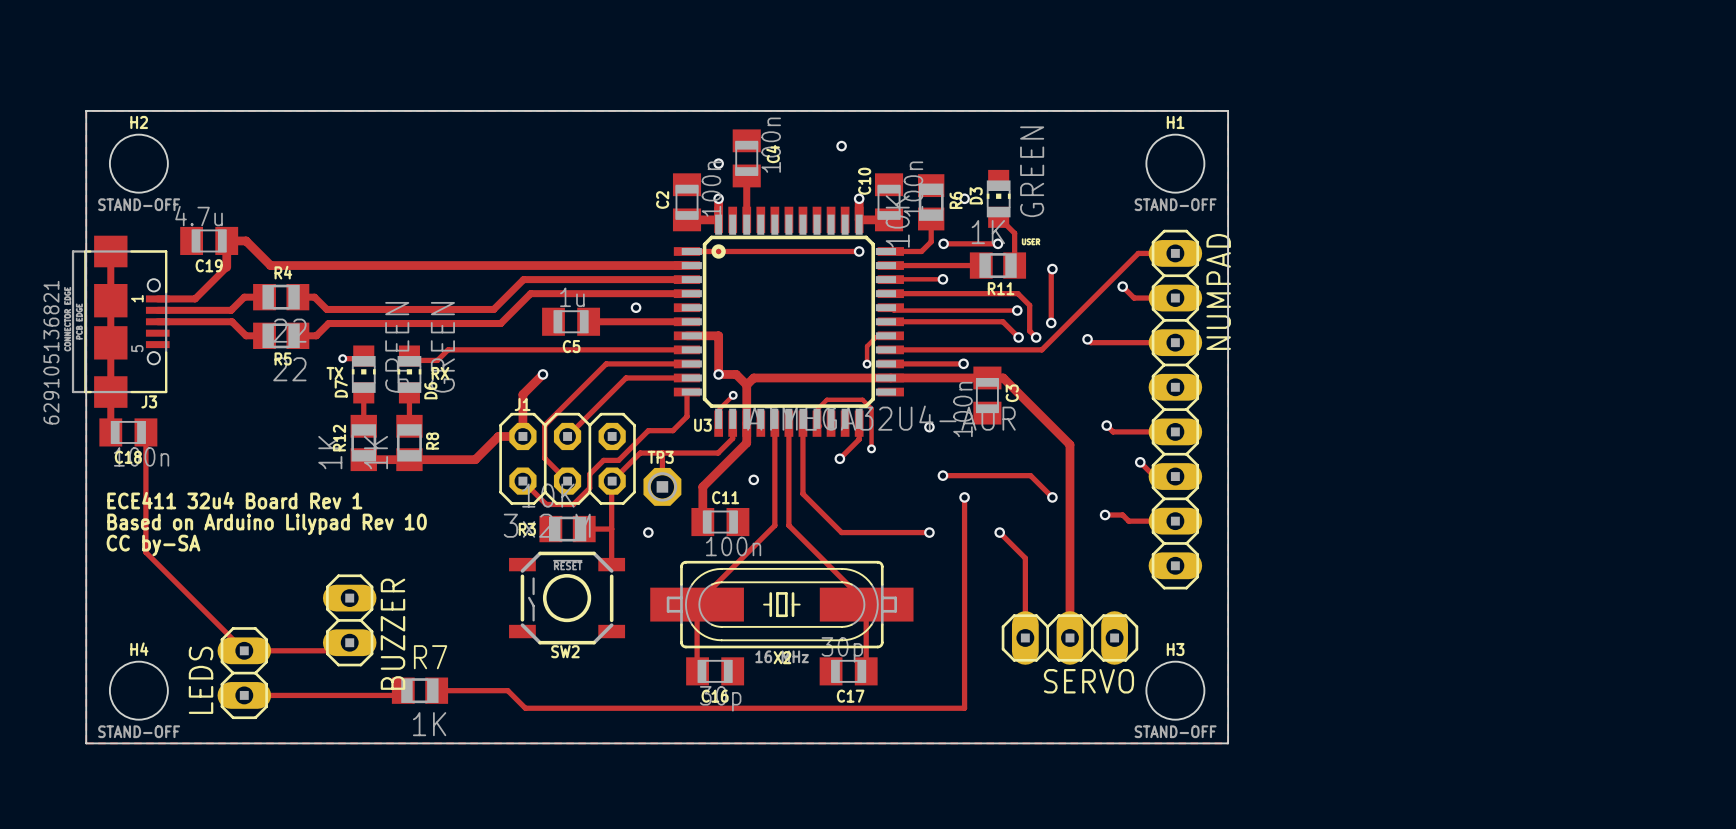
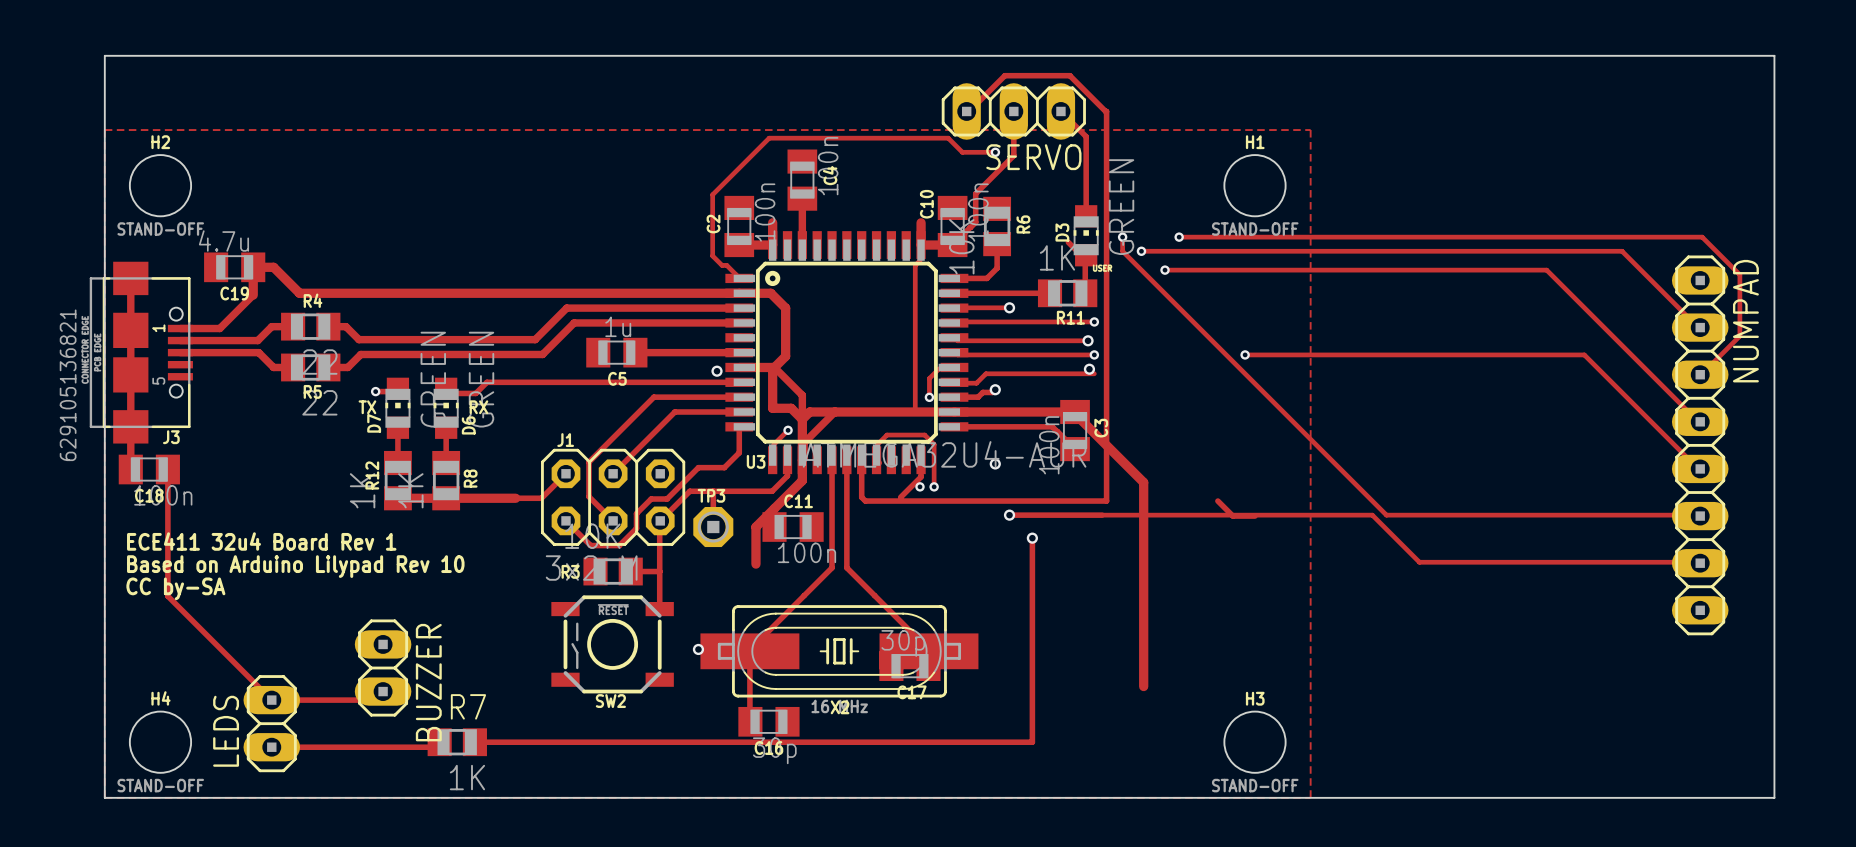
track: none -> (1013, 111) (1013, 155) (975, 193) (975, 222) (952, 245)
SERVO: none -> (1013, 111)
track: none -> (1060, 111) (1086, 136) (1086, 216)
board edge: (86, 110) (1228, 110) (1228, 743) -> (104, 130) (104, 55) (1774, 55) (1774, 797) (1310, 797)
via: none -> (995, 152)
via: (841, 146) -> none
via: (718, 163) -> none
via: (718, 198) -> none
via: (859, 198) -> none
via: (964, 198) -> none
D3 position: (998, 198) -> (1086, 235)
track: none -> (1122, 237) (1122, 251) (1386, 515) (1700, 516)
via: none -> (1122, 237)
track: none -> (1179, 237) (1702, 237) (1739, 274) (1739, 336) (1700, 374)
via: none -> (1179, 237)
track: none -> (920, 246) (920, 260) (915, 265) (915, 412)
track: none -> (1141, 251) (1622, 251) (1700, 327)
via: none -> (1141, 251)
track: (943, 243) (997, 243) -> none
via: (943, 243) -> none
via: (997, 243) -> none
track: none -> (1165, 270) (1546, 270) (1700, 421)
via: none -> (1165, 270)
track: (687, 251) (859, 251) -> (739, 278) (726, 265) (722, 265) (712, 255) (712, 194) (769, 138) (948, 138) (962, 152) (995, 152)
via: (859, 251) -> none
track: (1175, 253) (1138, 253) (1041, 349) (890, 349) -> (1094, 373) (985, 373) (976, 383) (954, 382)
track: none -> (739, 293) (770, 293) (785, 308) (785, 356) (774, 367) (802, 395) (802, 419)
track: (1052, 269) (1051, 322) -> none
via: (1052, 269) -> none
track: (1122, 286) (1134, 298) (1175, 298) -> none
via: (1122, 286) -> none
via: none -> (1094, 321)
track: (890, 293) (1017, 293) (1029, 305) (1029, 330) (1036, 337) -> (954, 322) (1094, 321)
via: (636, 307) -> none
track: (890, 321) (1002, 321) (1018, 337) -> (954, 352) (957, 354) (1094, 354)
via: (1051, 322) -> none
via: none -> (1094, 354)
track: none -> (1245, 354) (1584, 354) (1700, 468)
via: none -> (1245, 354)
via: (1036, 337) -> none
via: none -> (717, 371)
track: (1087, 339) (1090, 342) (1175, 342) -> none
via: (1087, 339) -> none
track: (913, 363) (963, 363) -> (978, 397) (982, 392) (992, 392) (995, 389)
via position: (963, 363) -> (995, 389)
track: (542, 374) (522, 394) (522, 436) (498, 436) (475, 459) -> (566, 473) (541, 498) (515, 498)
via: (542, 374) -> none
via: (718, 374) -> none
track: none -> (834, 412) (804, 442) (804, 458) (802, 460)
track: none -> (954, 426) (1052, 426) (1075, 449)
C3 position: (987, 395) -> (1075, 430)
NUMPAD position: (1175, 409) -> (1700, 445)
track: (1106, 425) (1113, 431) (1175, 431) -> none
via: (1106, 425) -> none
via: none -> (920, 486)
track: (802, 458) (802, 493) (841, 532) (929, 532) -> (861, 497) (865, 501) (1106, 501) (1106, 111) (1069, 75) (1004, 75) (969, 111) (966, 111)
via: (839, 458) -> none
via: (1140, 462) -> none
track: (1030, 475) (1052, 497) -> (1102, 515) (1372, 515) (1419, 562) (1700, 563)
via: (753, 479) -> none
via: (1052, 497) -> none
track: (1105, 515) (1122, 515) (1128, 521) (1175, 521) -> none
via: (1105, 515) -> none
C11 position: (720, 522) -> (793, 527)
via position: (648, 532) -> (698, 649)
via: (929, 532) -> none
track: (999, 532) (1025, 558) (1025, 637) -> none
via: (999, 532) -> none
track: (866, 618) (866, 671) -> none
SERVO: (1069, 637) -> none
C17 position: (848, 671) -> (909, 666)
track: (507, 690) (525, 708) (964, 708) (964, 690) -> (550, 742) (1032, 742)

